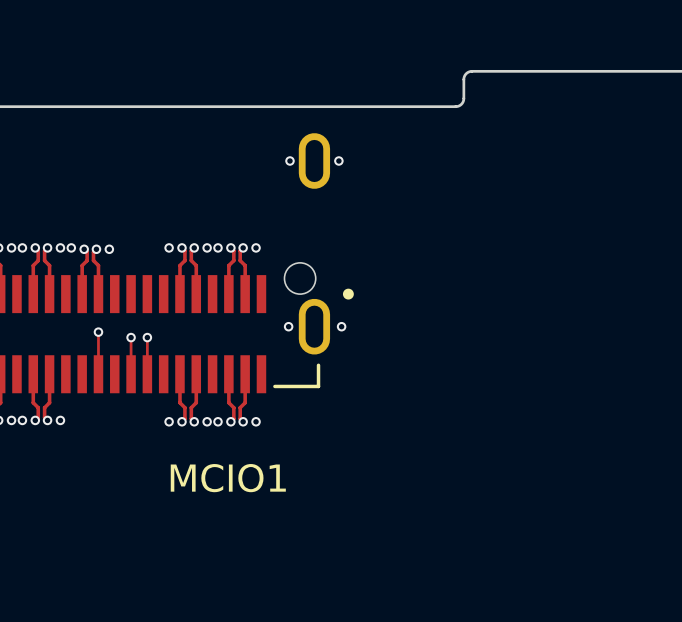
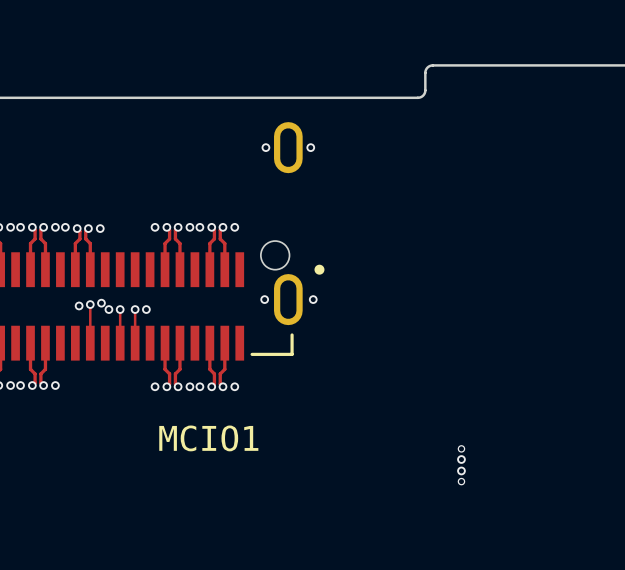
via: none -> (101, 303)
via: none -> (79, 305)
via: none -> (108, 309)
via: none -> (146, 309)
via: none -> (461, 448)
via: none -> (461, 459)
via: none -> (461, 470)
via: none -> (461, 481)

